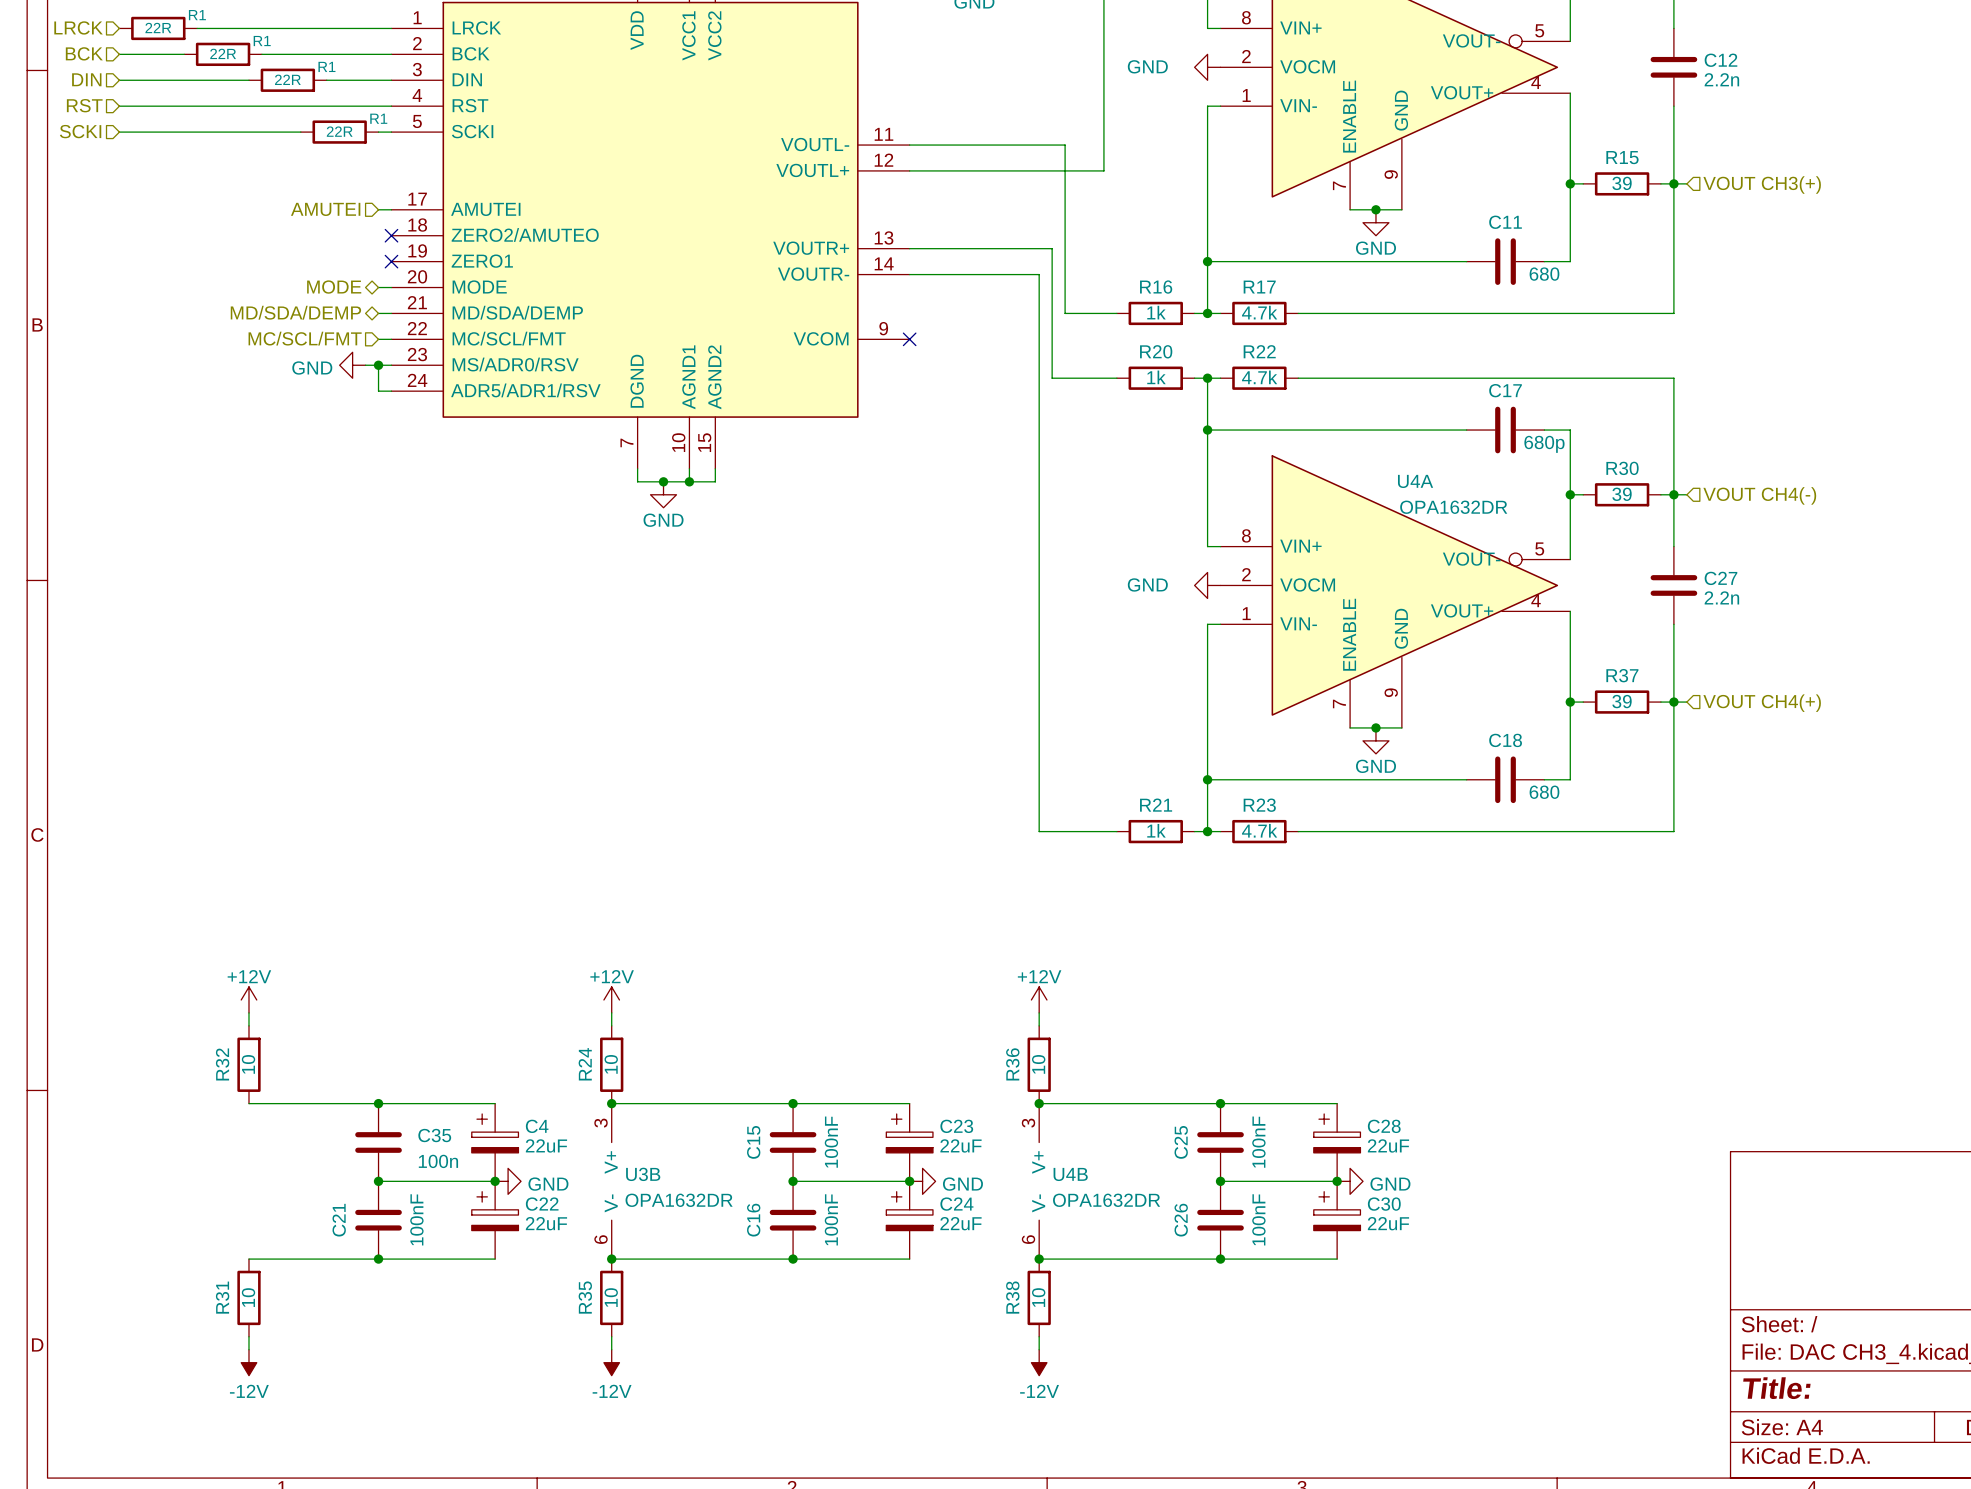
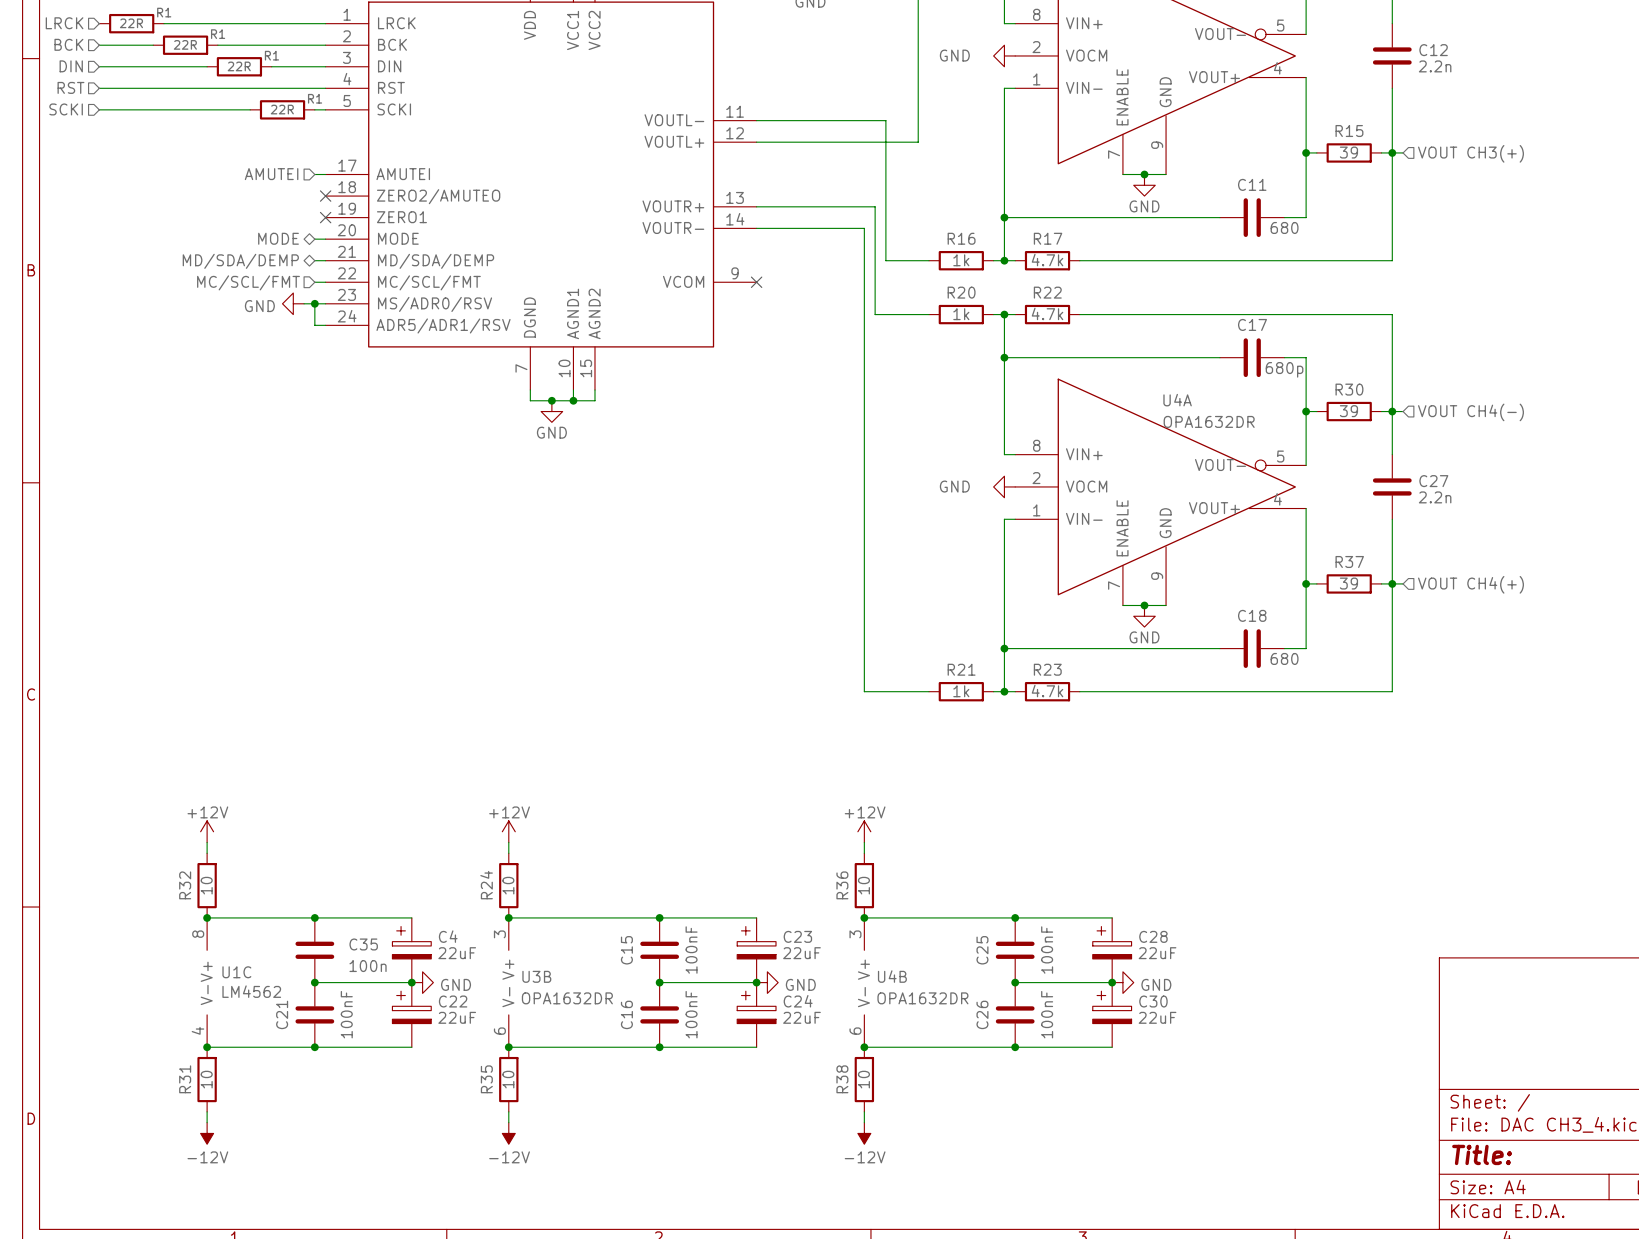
junction: none -> (207, 917)
U1C: none -> LM4562 (207, 982)
junction: none -> (207, 1047)

